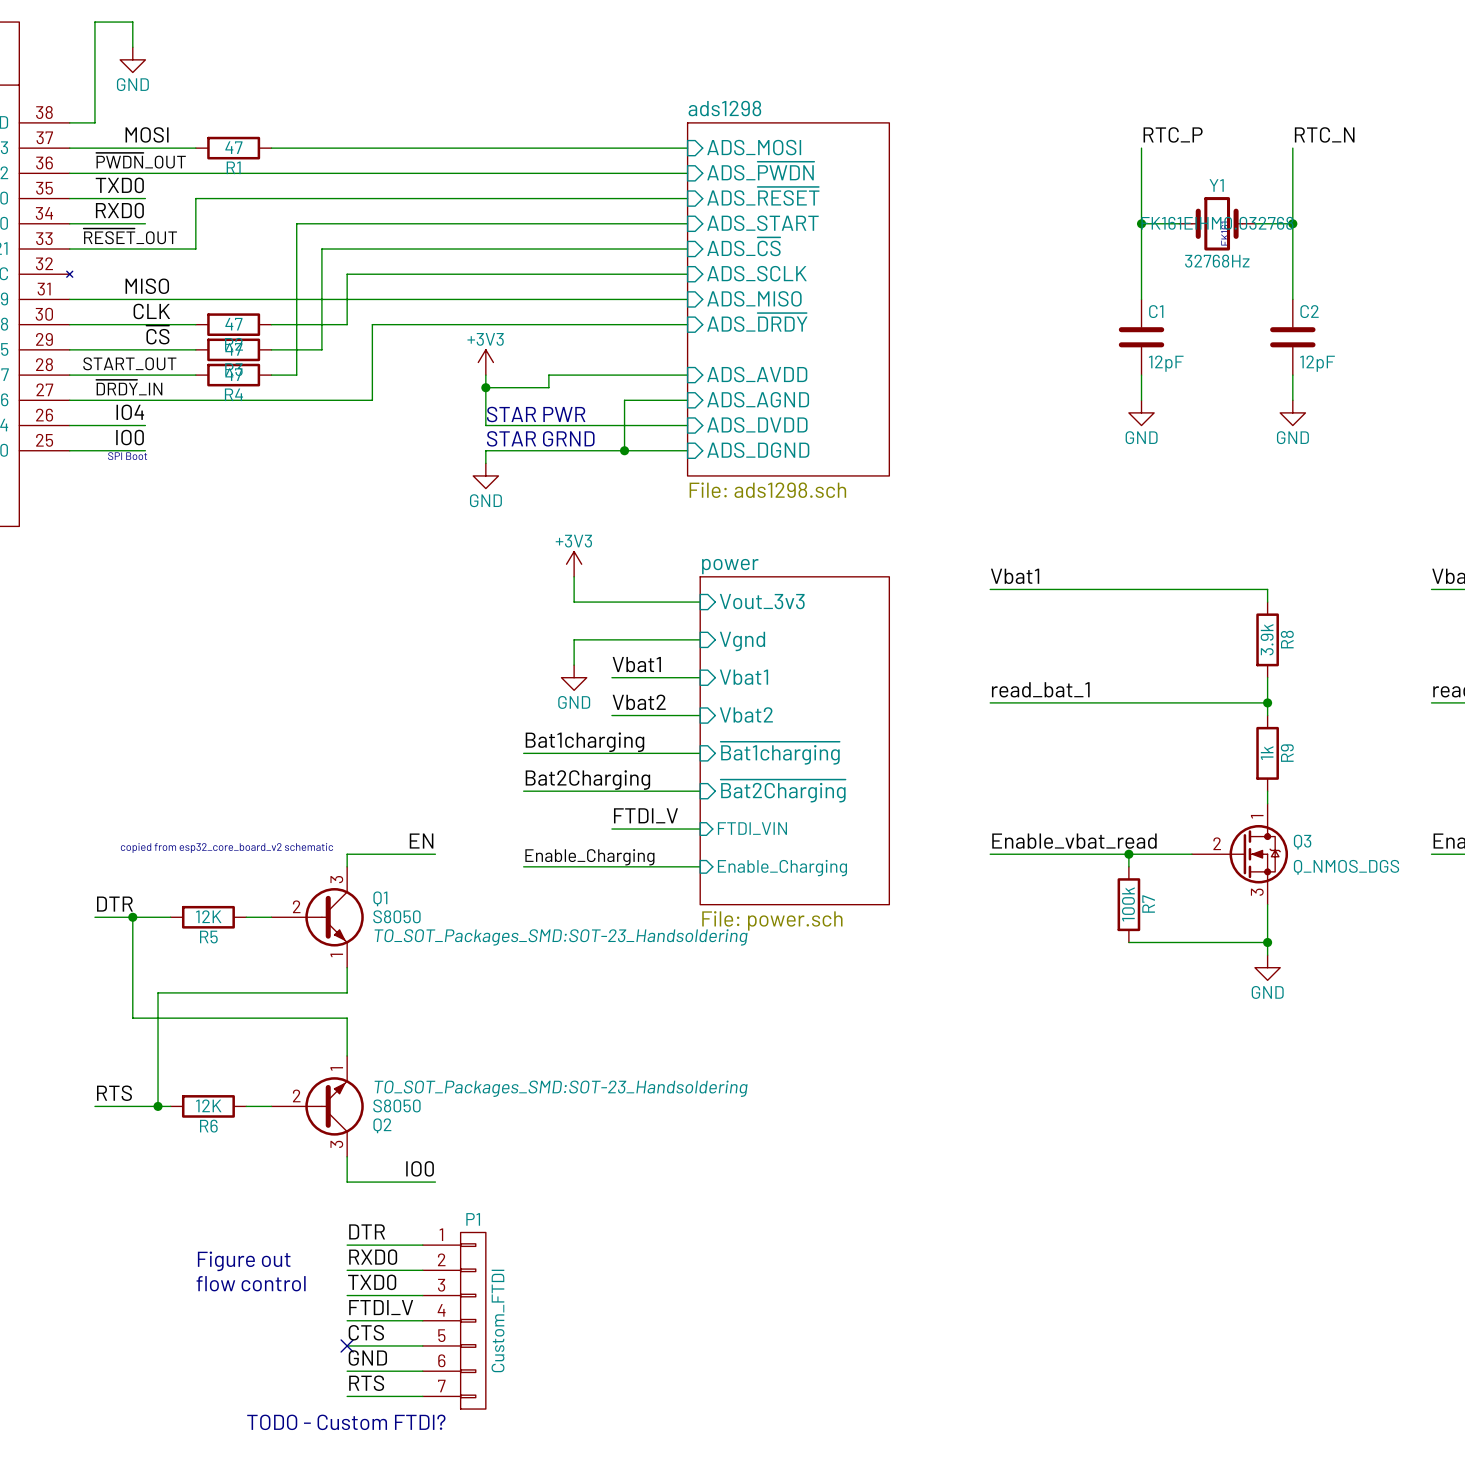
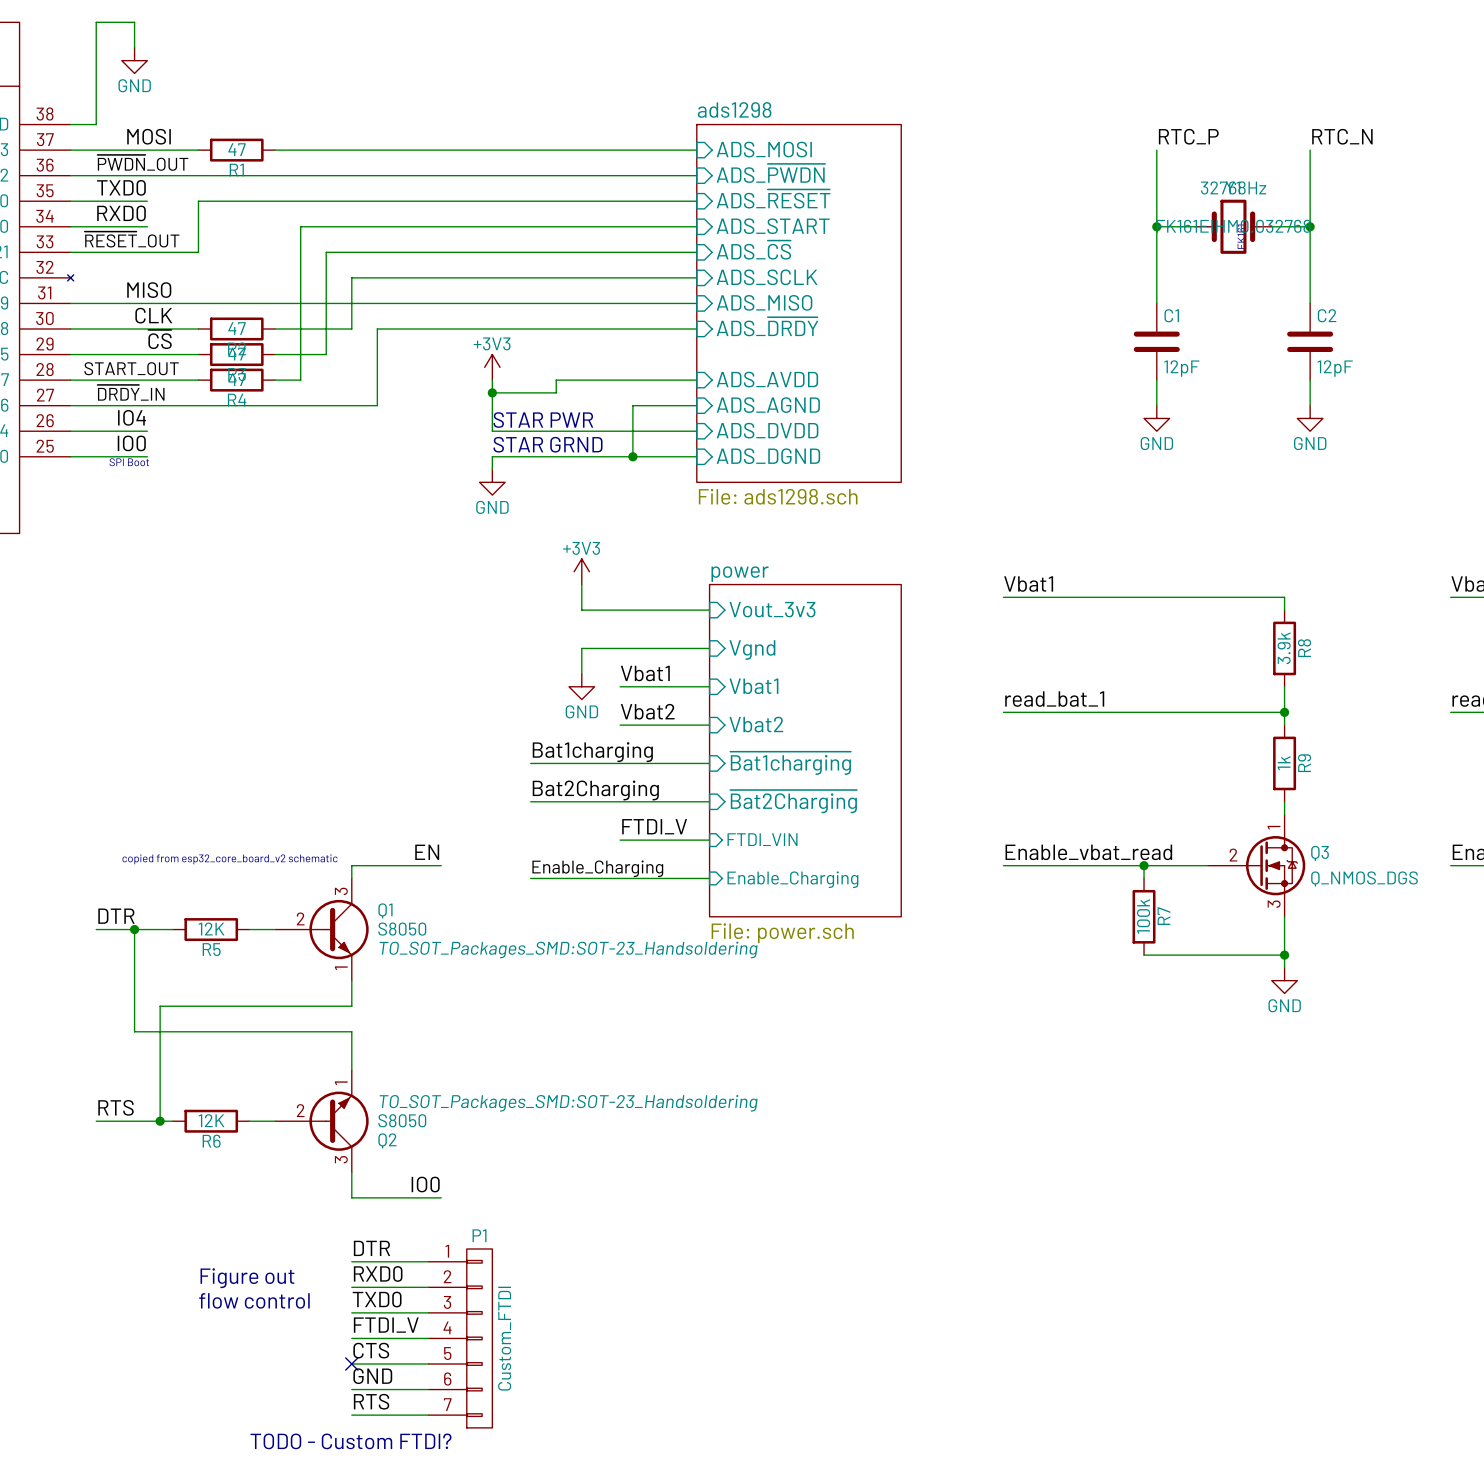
Y1 value position: 32768Hz (1217, 261) -> 32768Hz (1233, 187)

